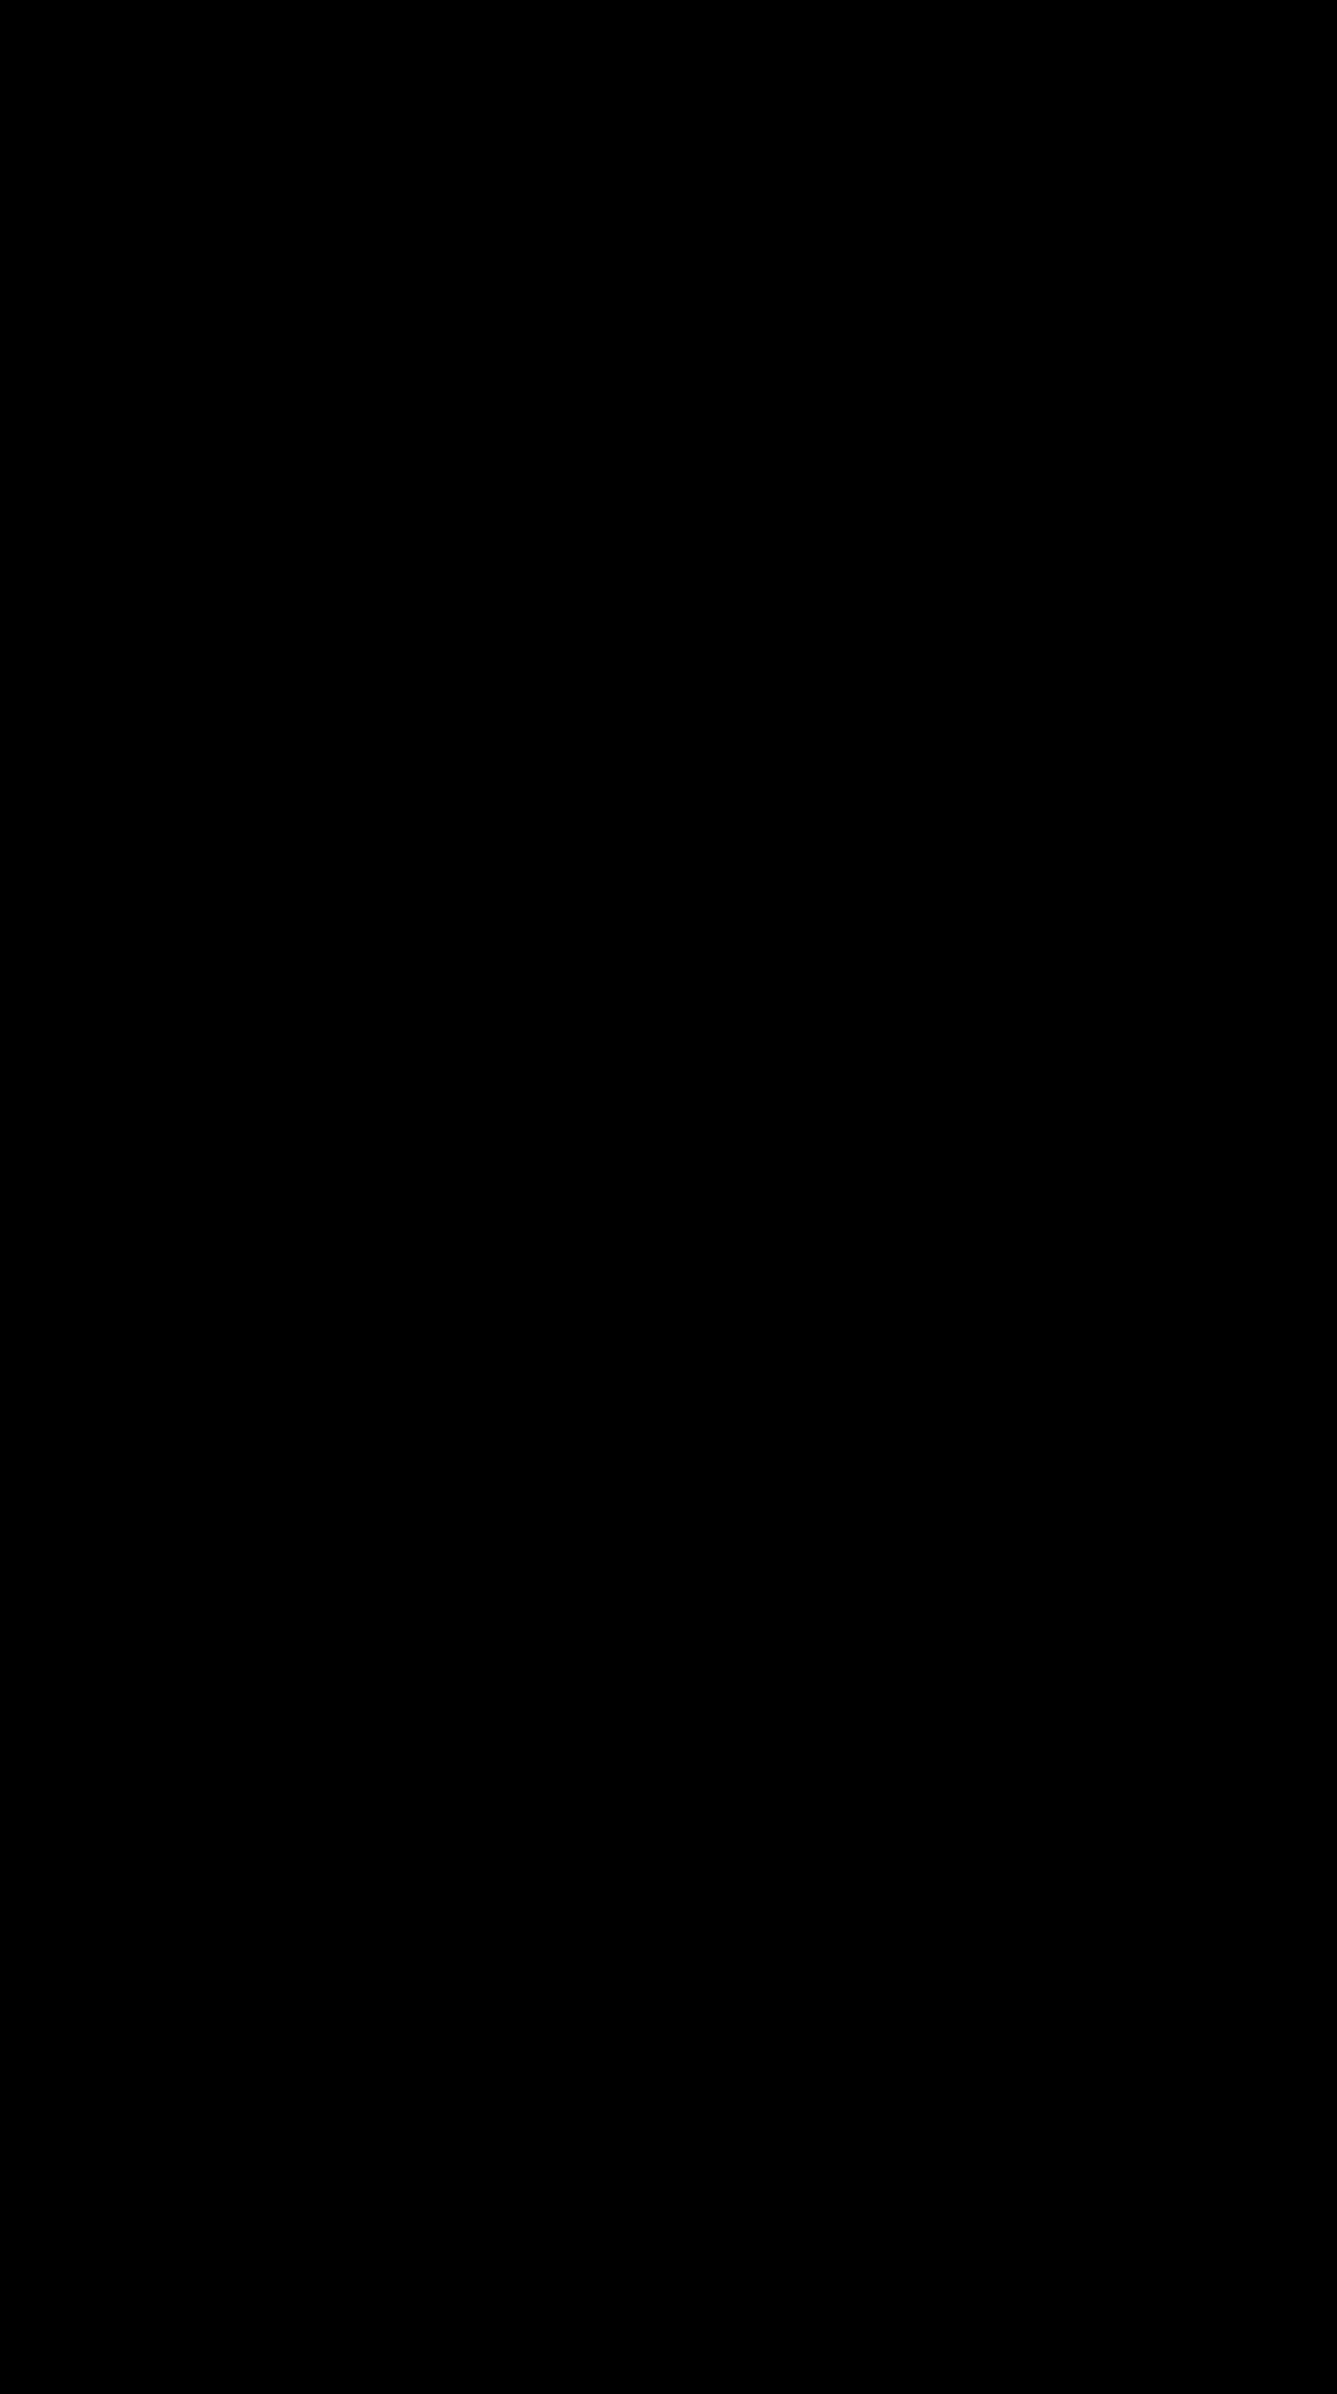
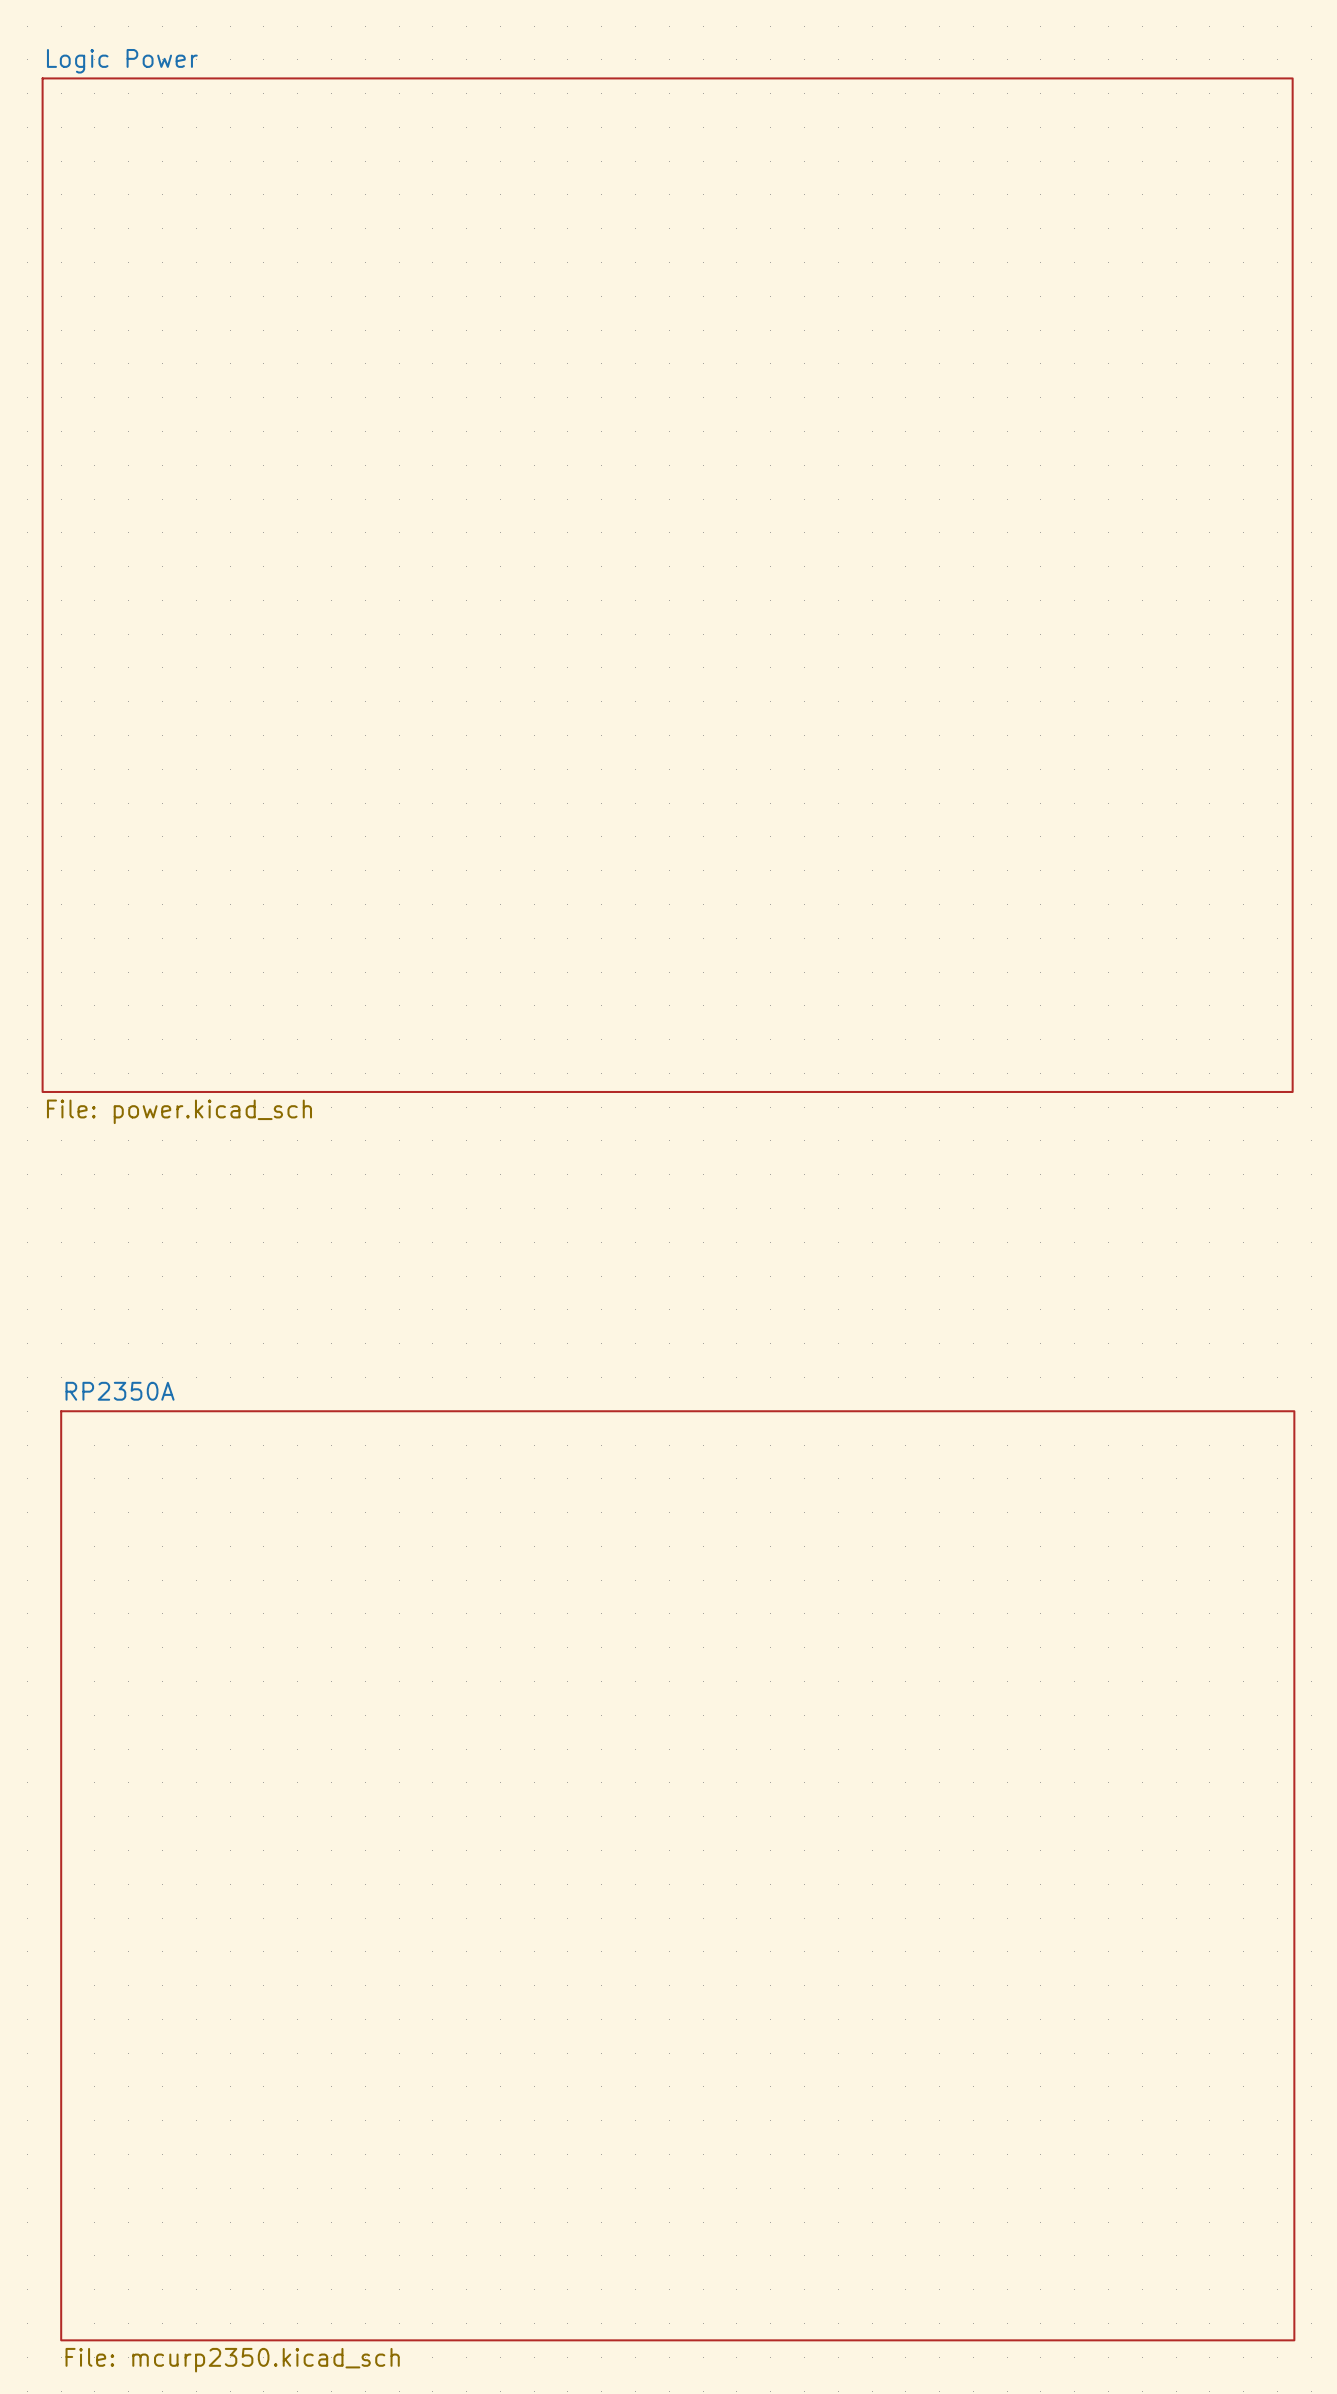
sheet Logic Power: none -> File: power.kicad_sch (667, 585)
sheet RP2350A: none -> File: mcurp2350.kicad_sch (677, 1875)

